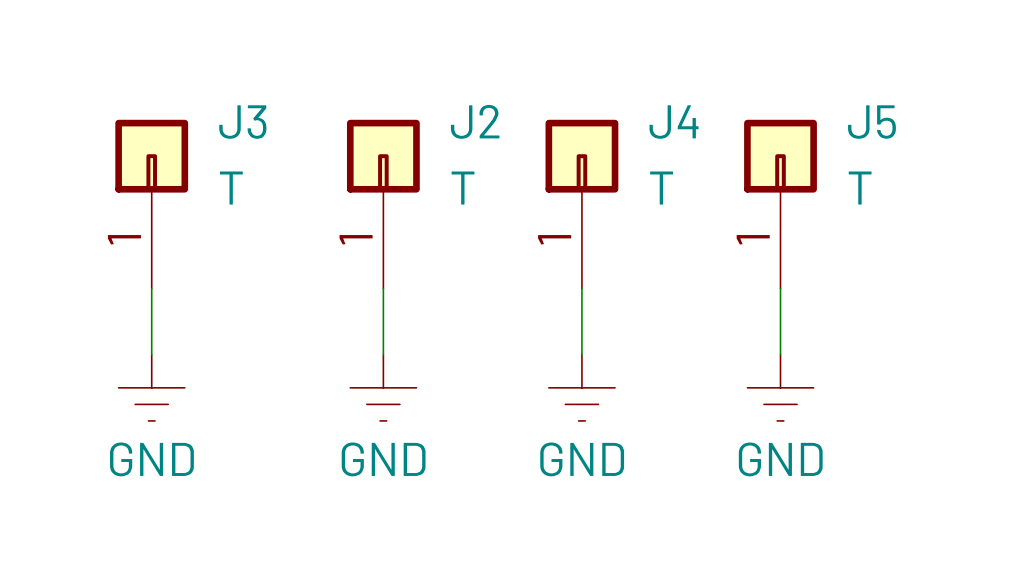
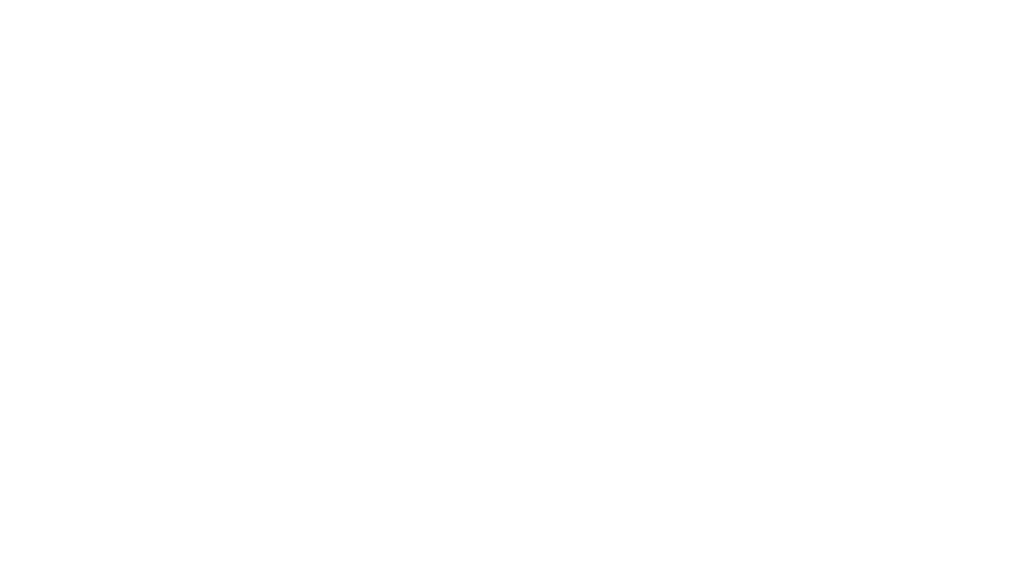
J3: T (151, 204) -> none
J2: T (383, 204) -> none
J4: T (581, 204) -> none
J5: T (780, 204) -> none
wire: (151, 288) (151, 354) -> none
wire: (383, 288) (383, 354) -> none
wire: (581, 288) (581, 354) -> none
wire: (780, 288) (780, 354) -> none
power symbol: GND (151, 387) -> none
power symbol: GND (383, 387) -> none
power symbol: GND (581, 387) -> none
power symbol: GND (780, 387) -> none

